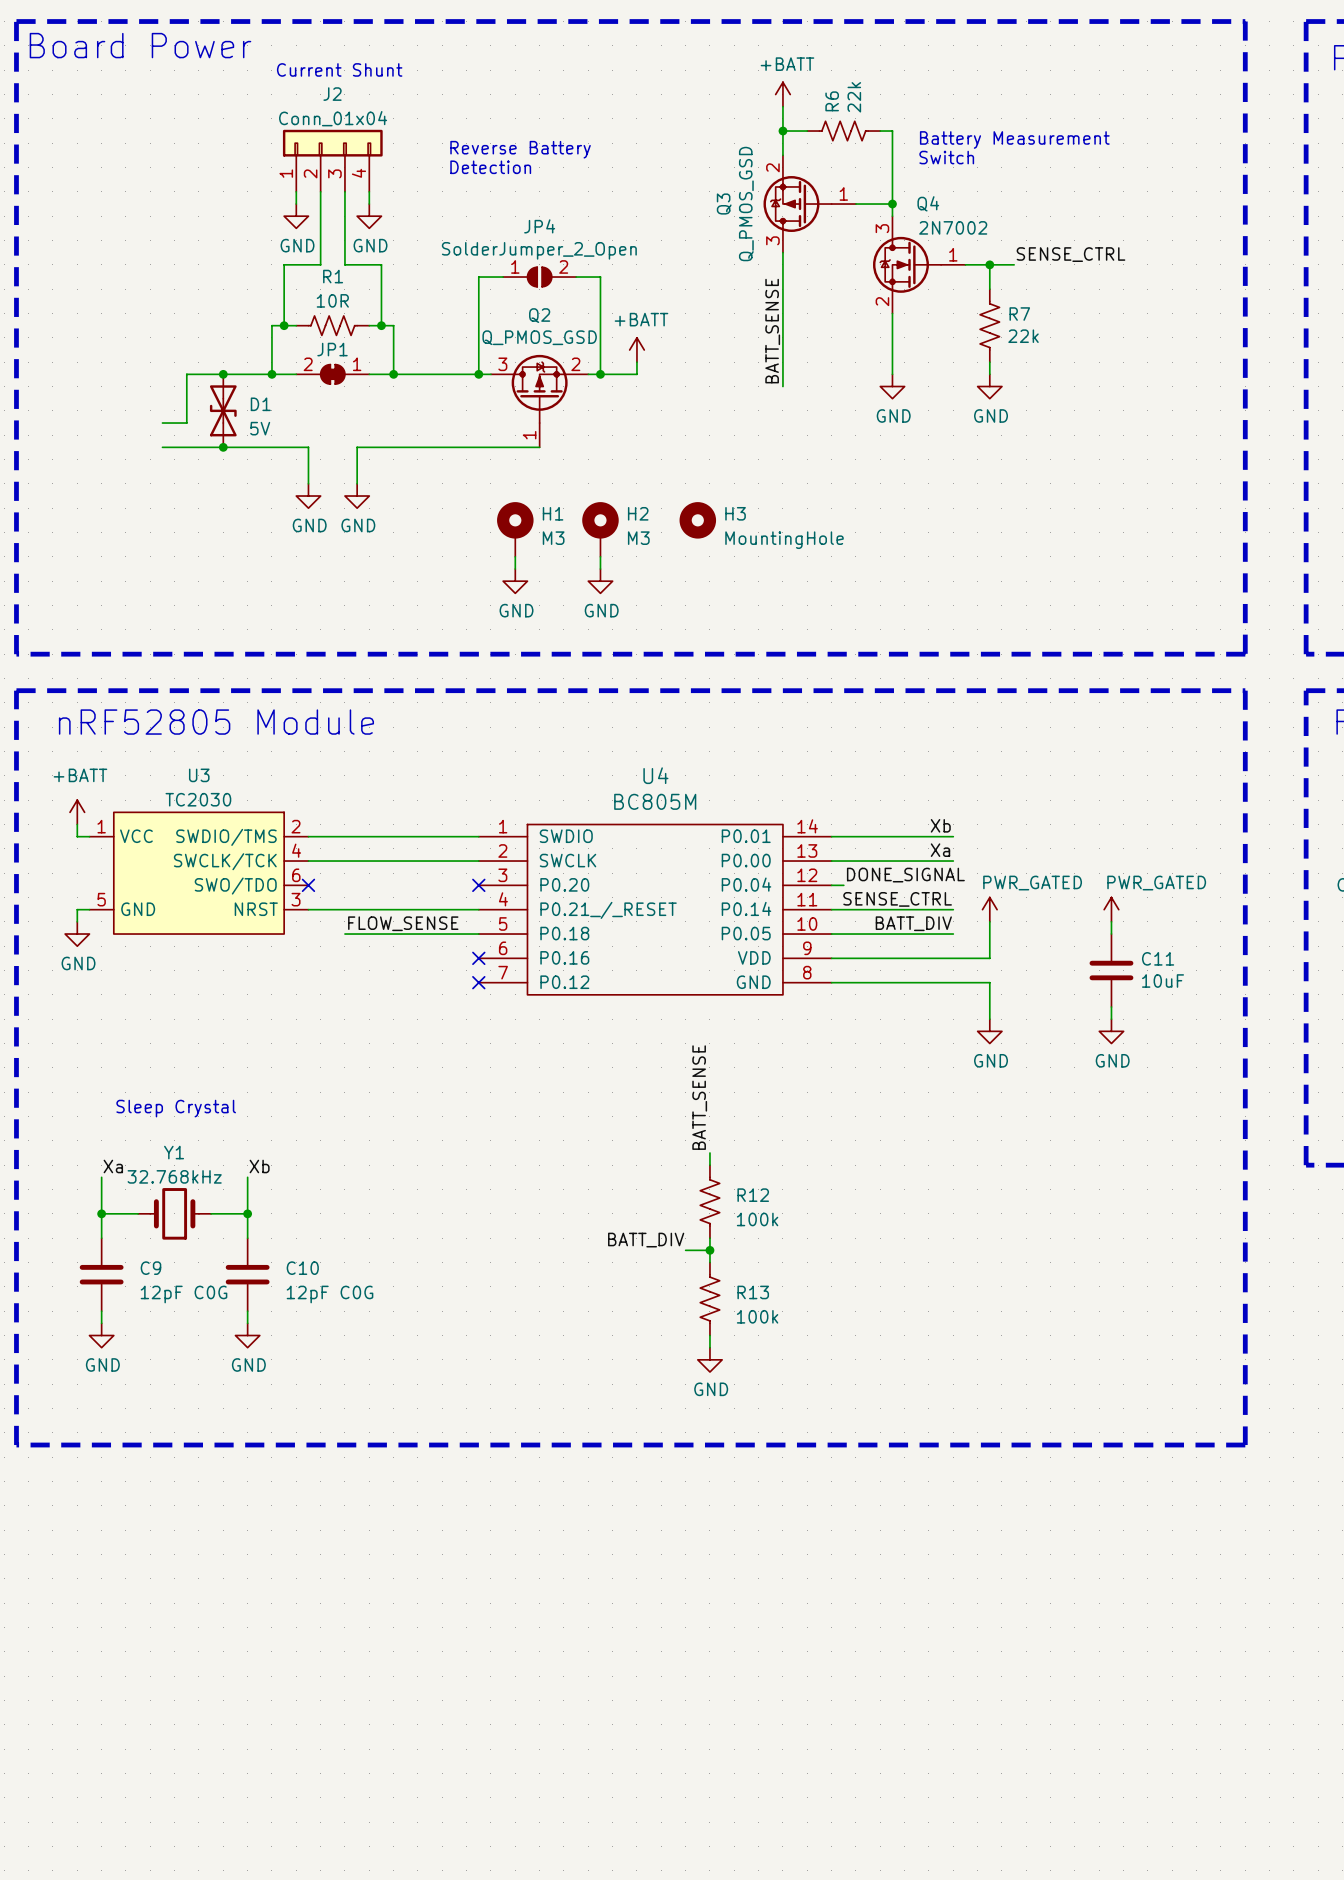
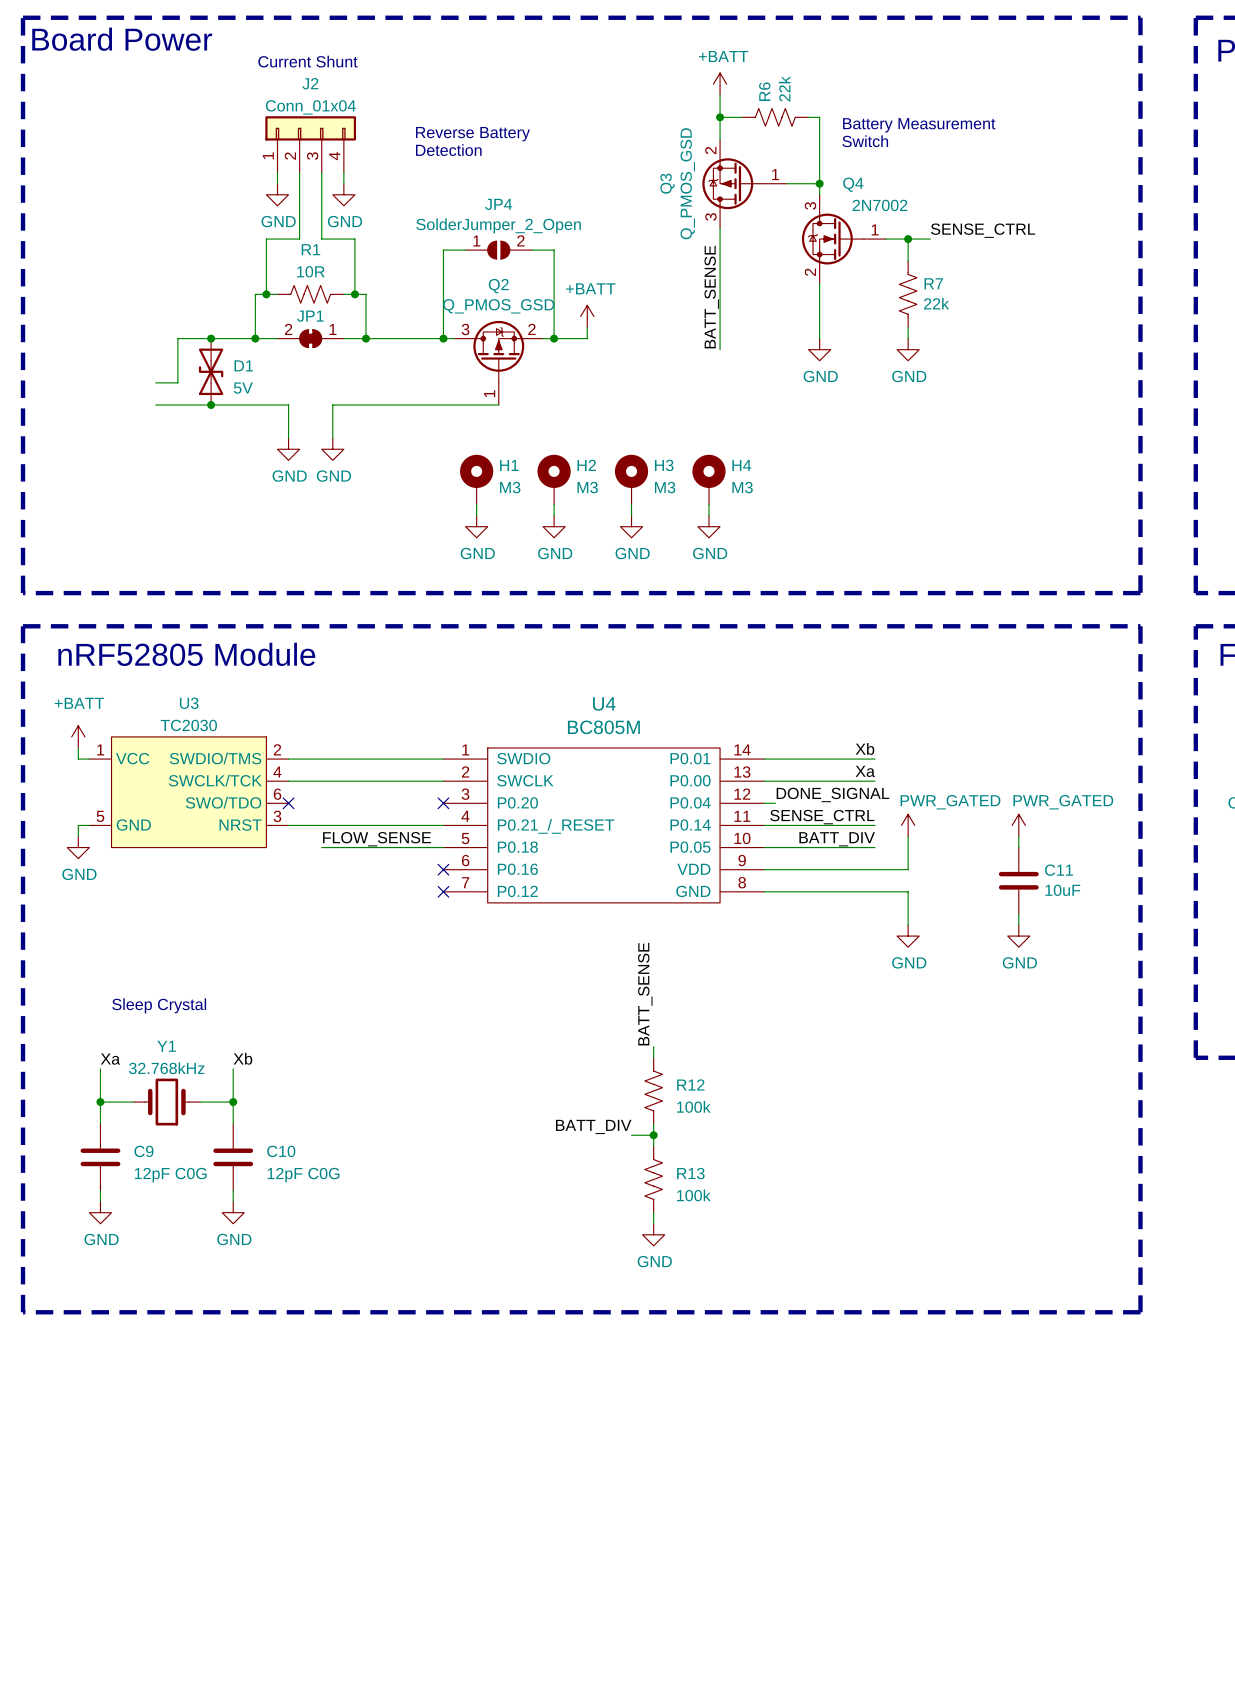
H3 symbol: [679, 502, 717, 539] -> [614, 454, 649, 505]
H4: none -> M3 (708, 479)
H3 value: MountingHole (784, 540) -> M3 (665, 487)
wire: none -> (631, 504) (631, 515)
wire: none -> (708, 504) (708, 515)
power symbol: none -> GND (631, 526)
power symbol: none -> GND (708, 526)

